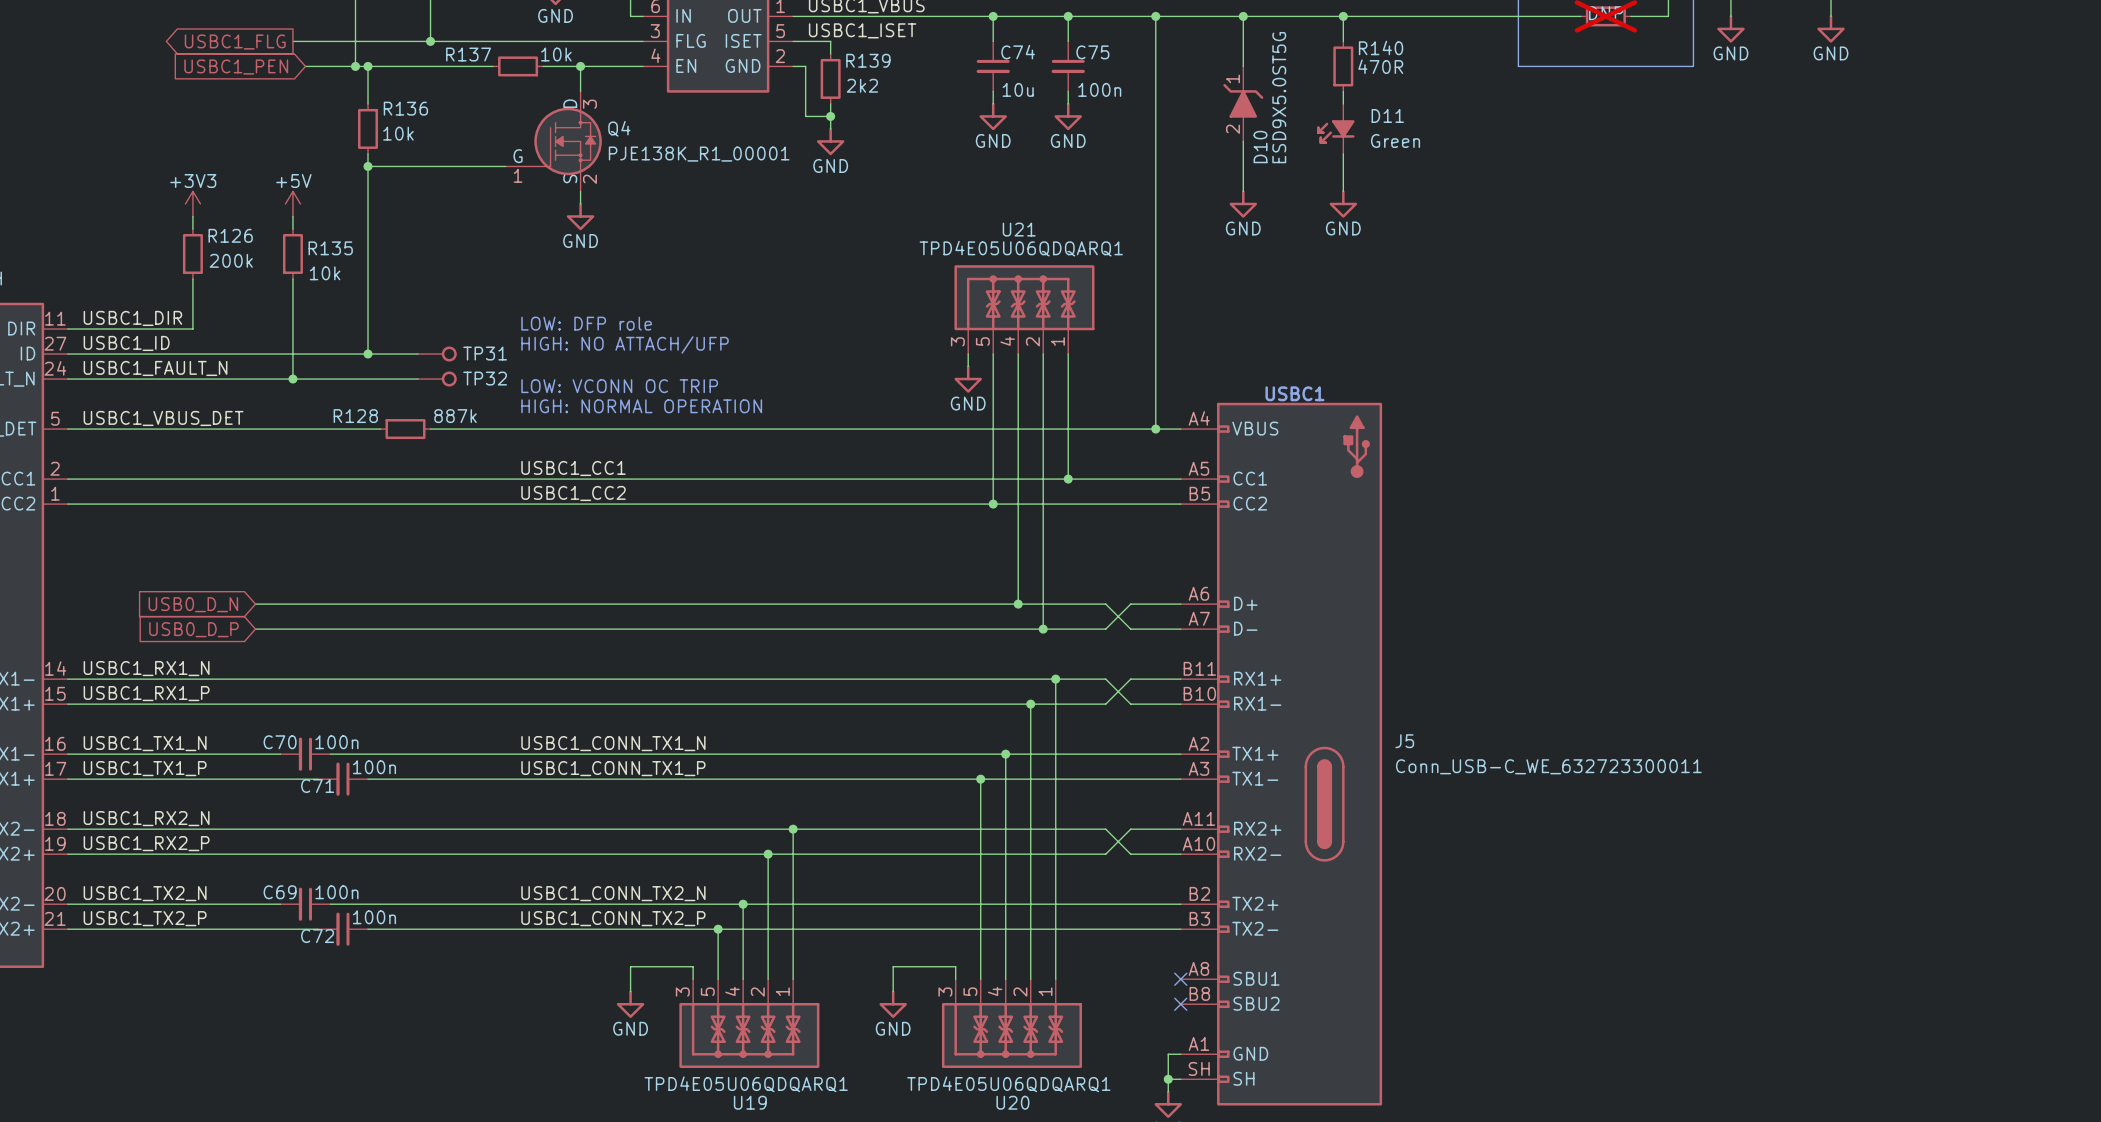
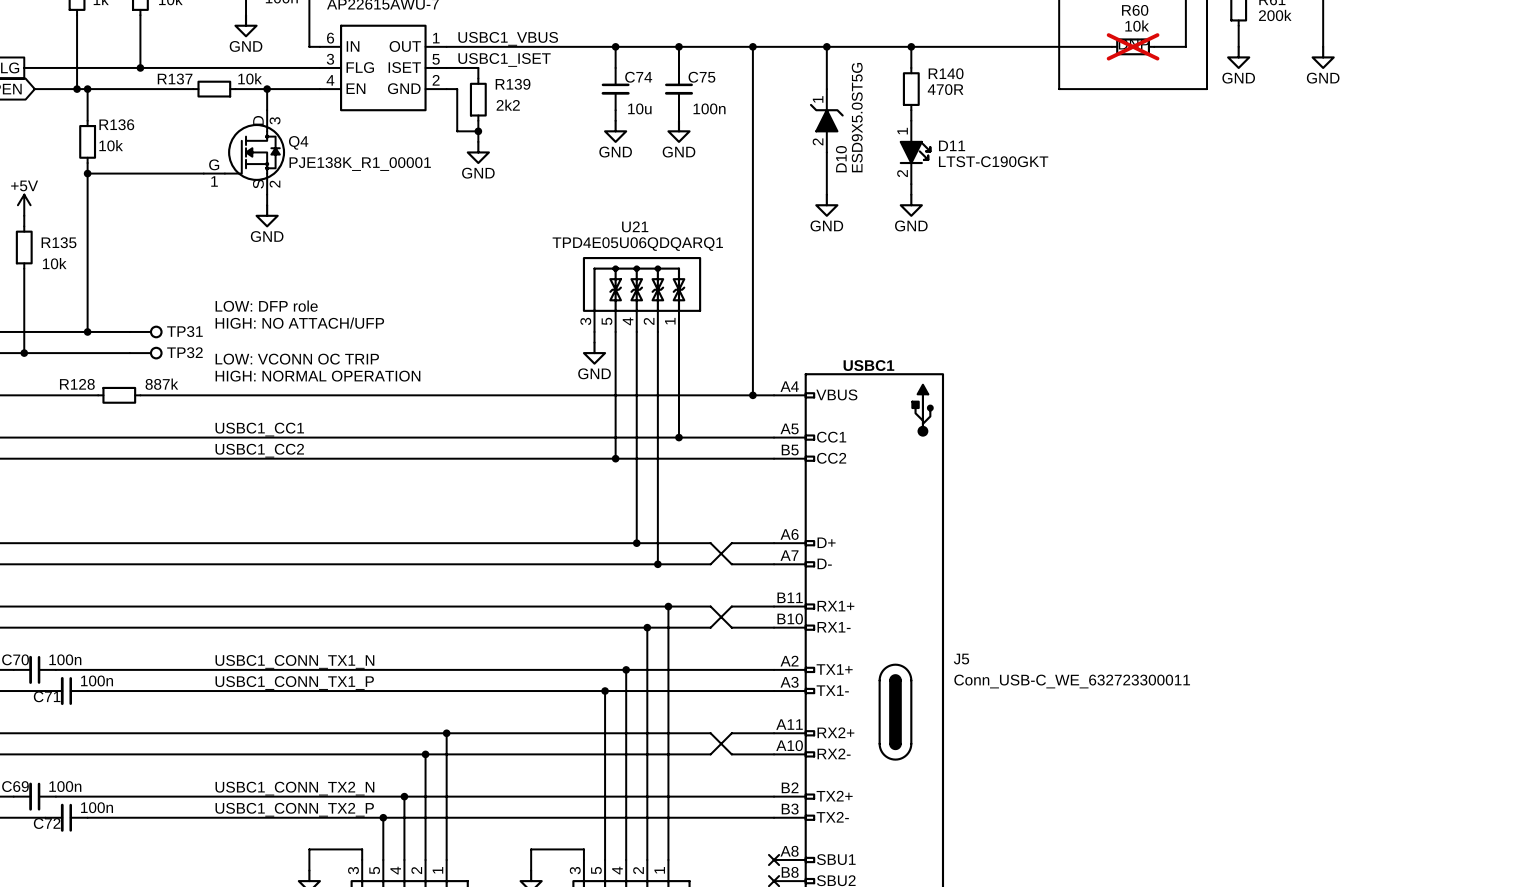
D11 symbol: [1317, 103, 1355, 154] -> [899, 120, 932, 185]
D11 text: Green (1395, 140) -> none
D11 text: none -> LTST-C190GKT (993, 161)

